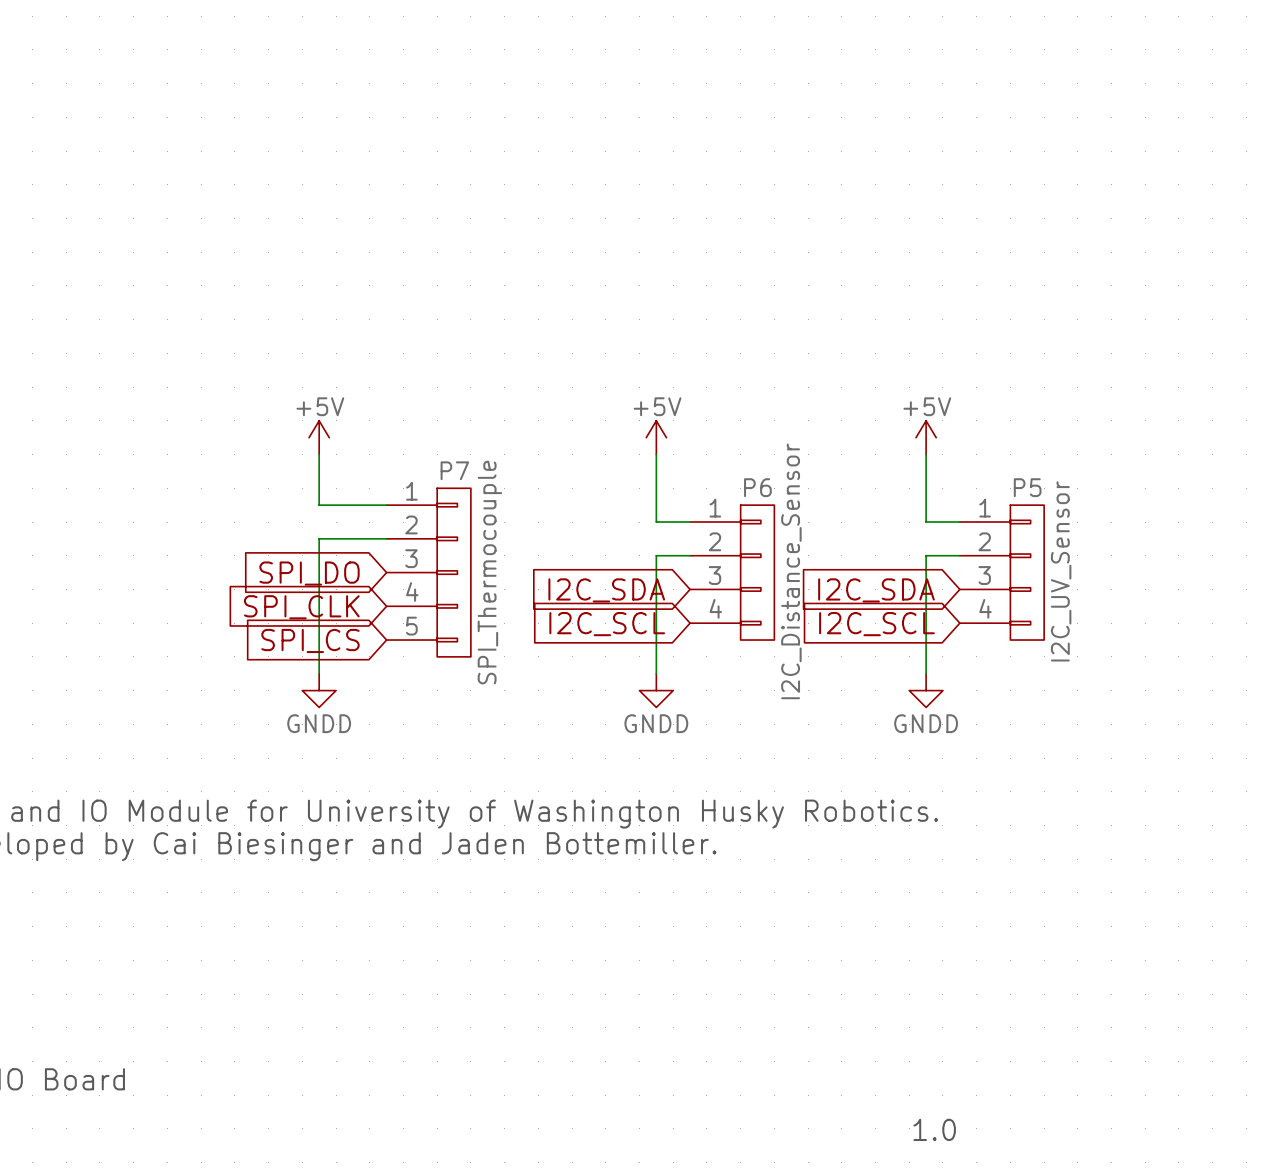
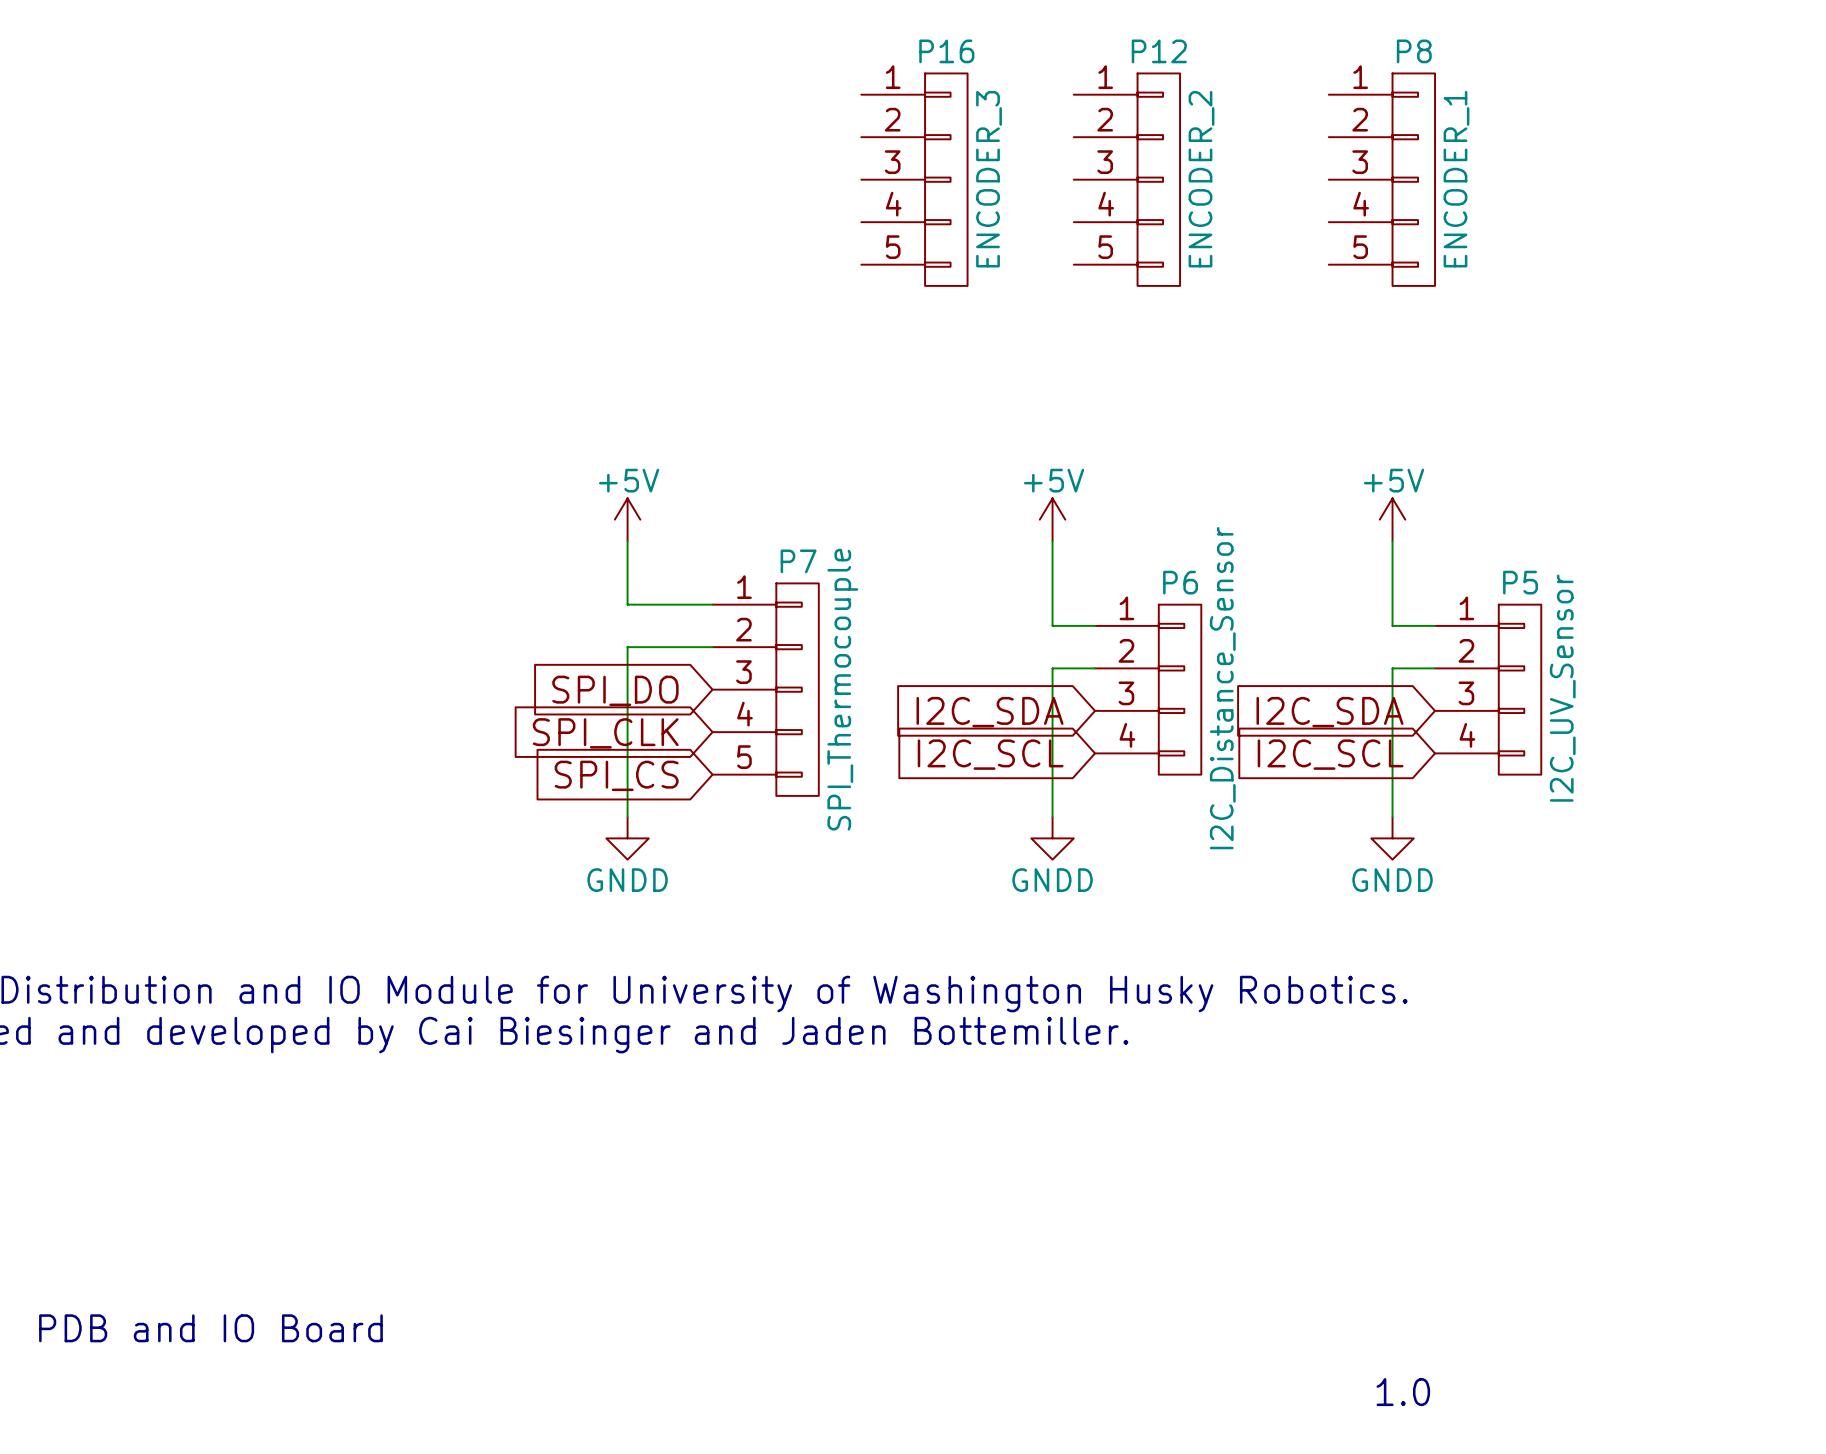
P16: none -> ENCODER_3 (914, 179)
P12: none -> ENCODER_2 (1126, 179)
P8: none -> ENCODER_1 (1381, 179)

